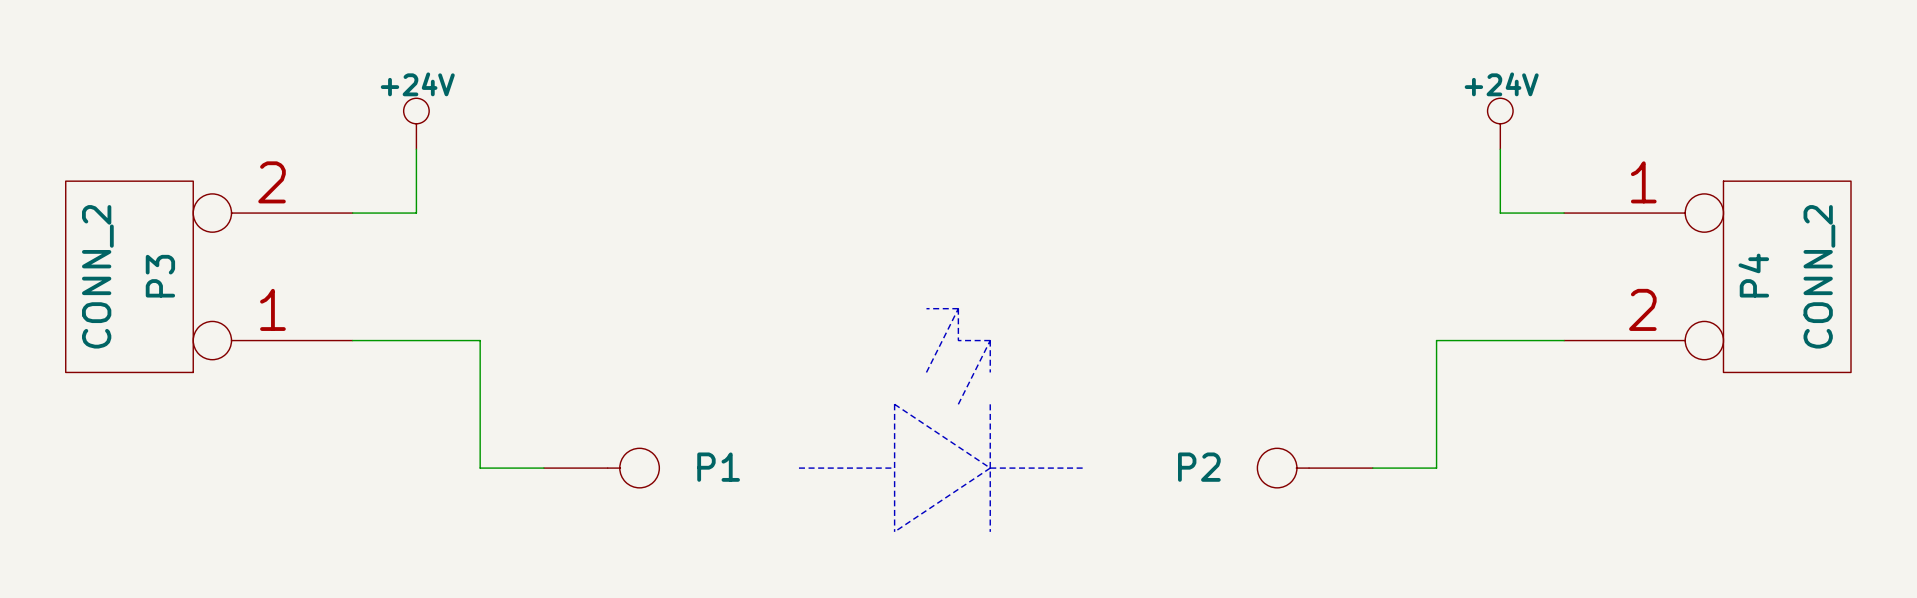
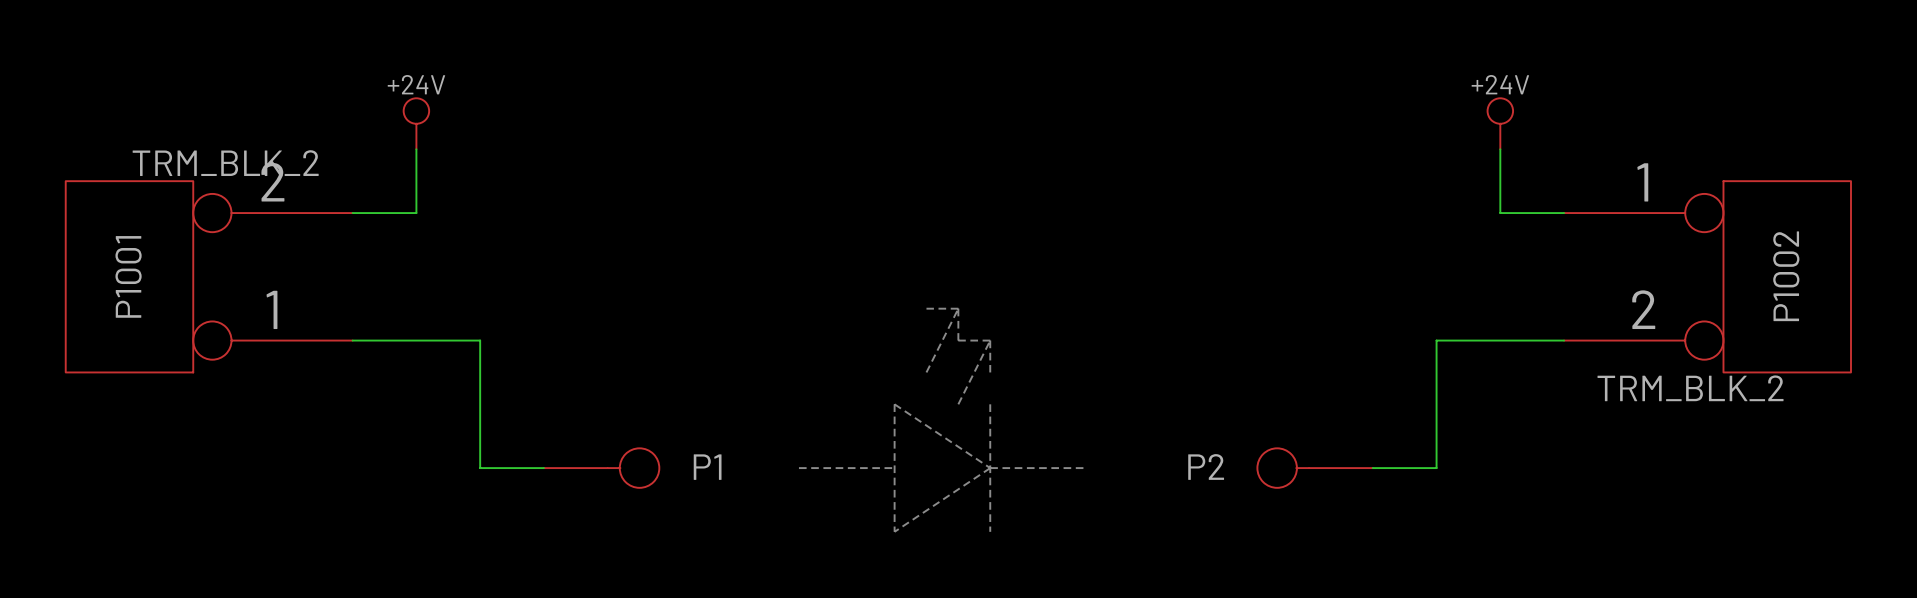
P3 text: none -> TRM_BLK_2 (225, 163)
P4 name: P4 (1753, 275) -> P1002 (1786, 276)
P3 value: CONN_2 (97, 276) -> none
P3 name: P3 (160, 276) -> P1001 (128, 276)
P4 value: CONN_2 (1819, 276) -> none
P4 text: none -> TRM_BLK_2 (1690, 388)

